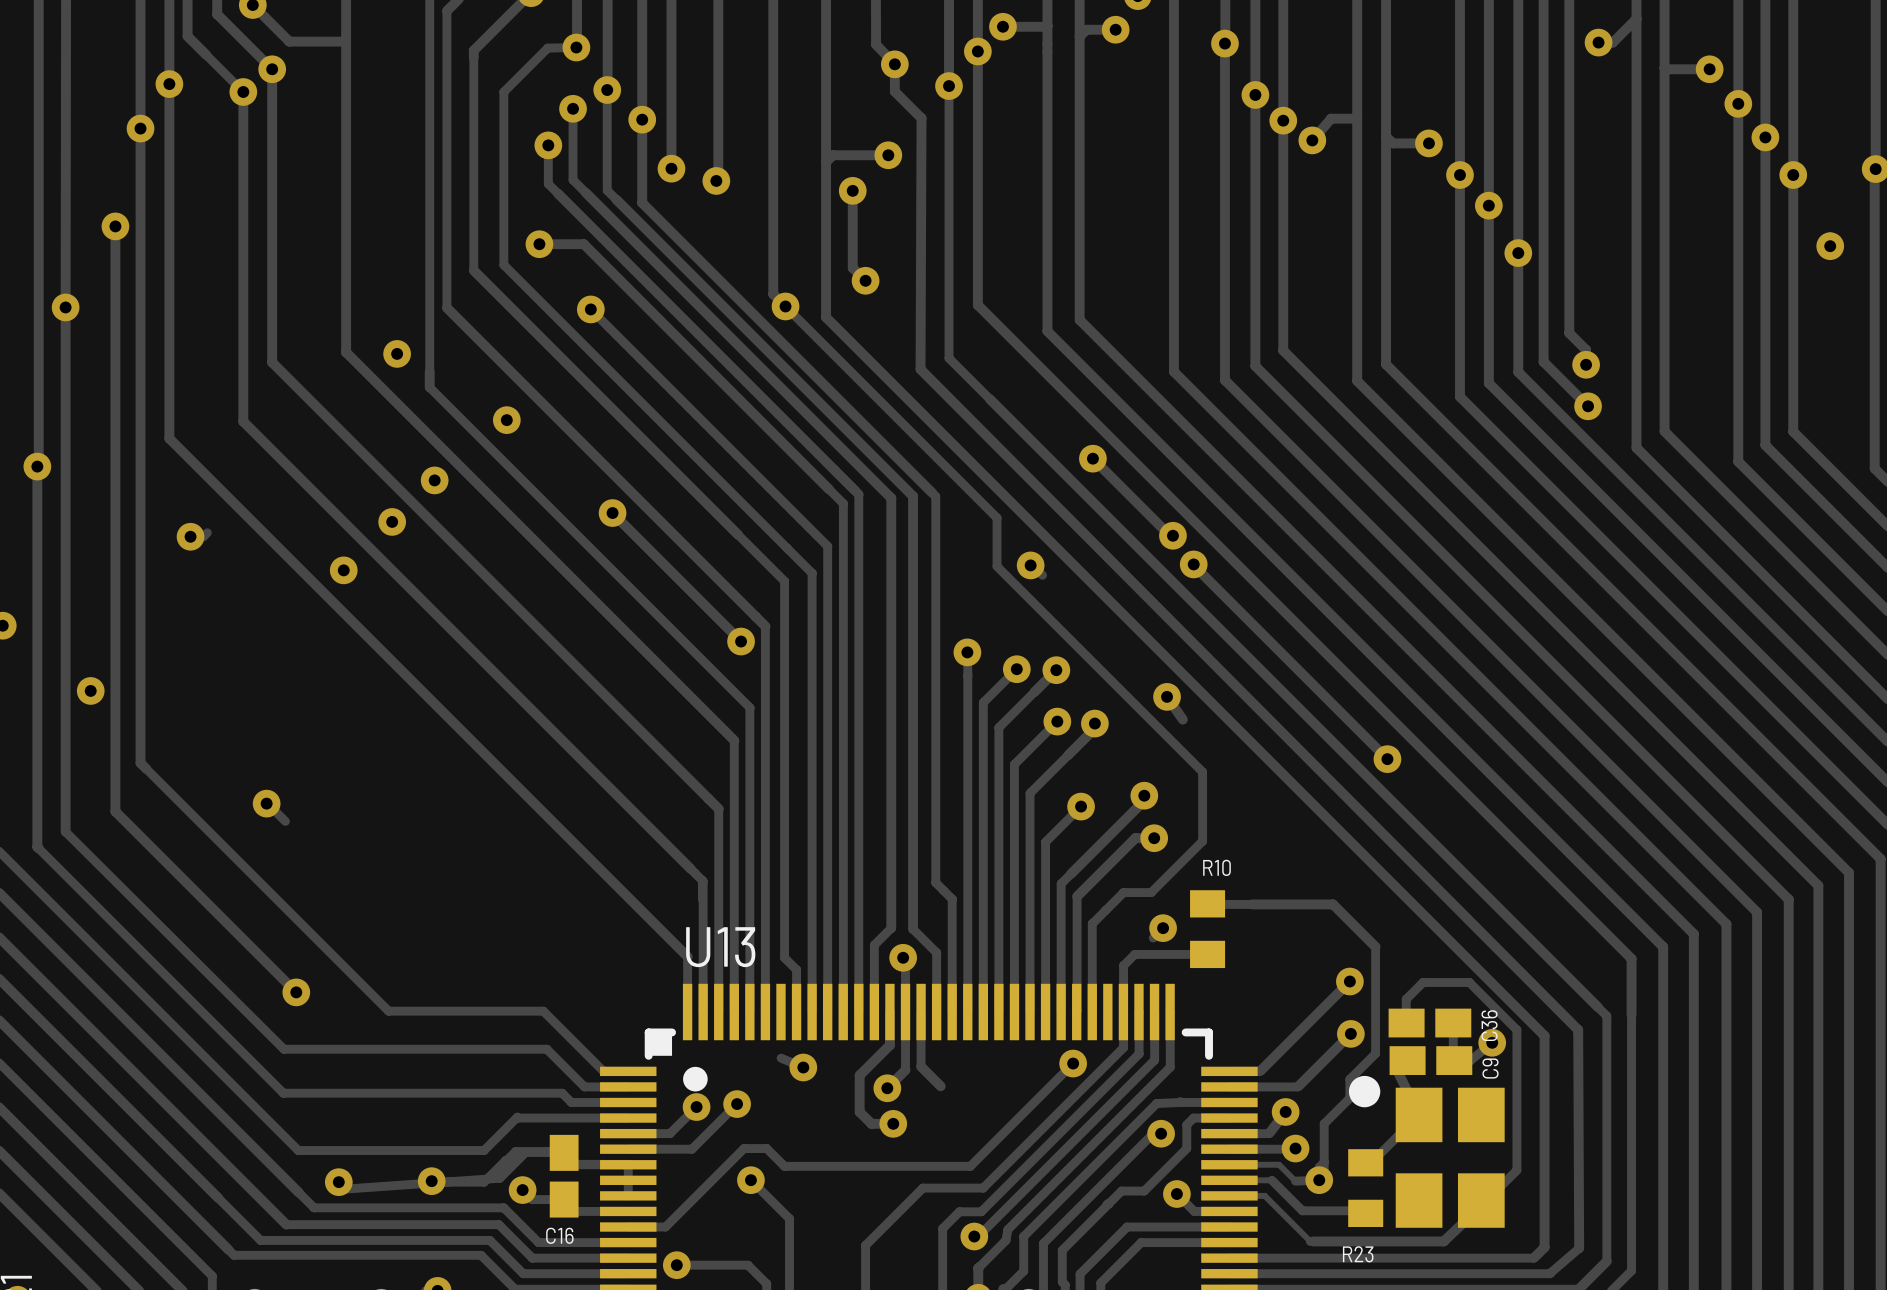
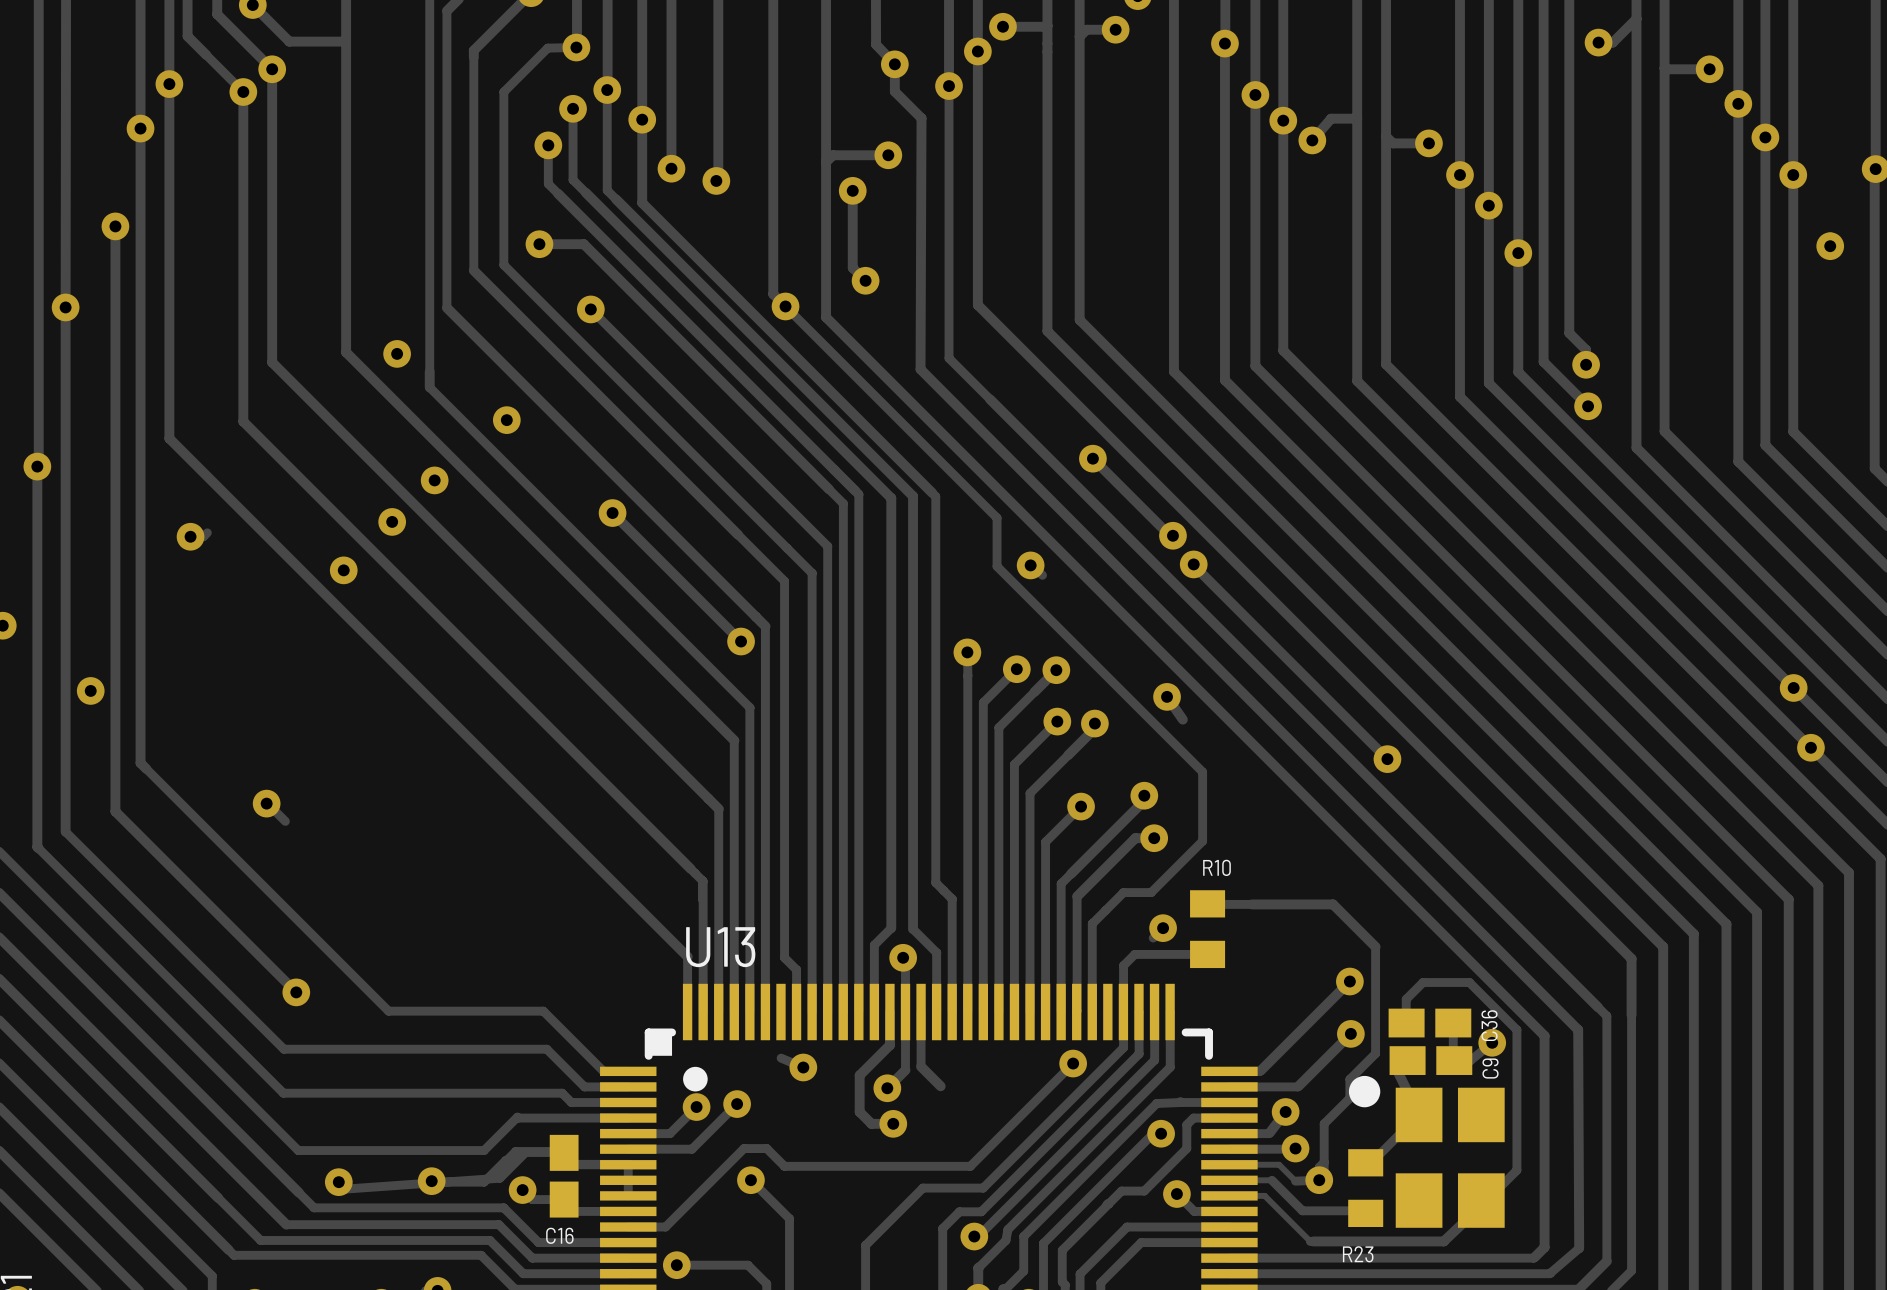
via: none -> (1793, 687)
via: none -> (1810, 747)

